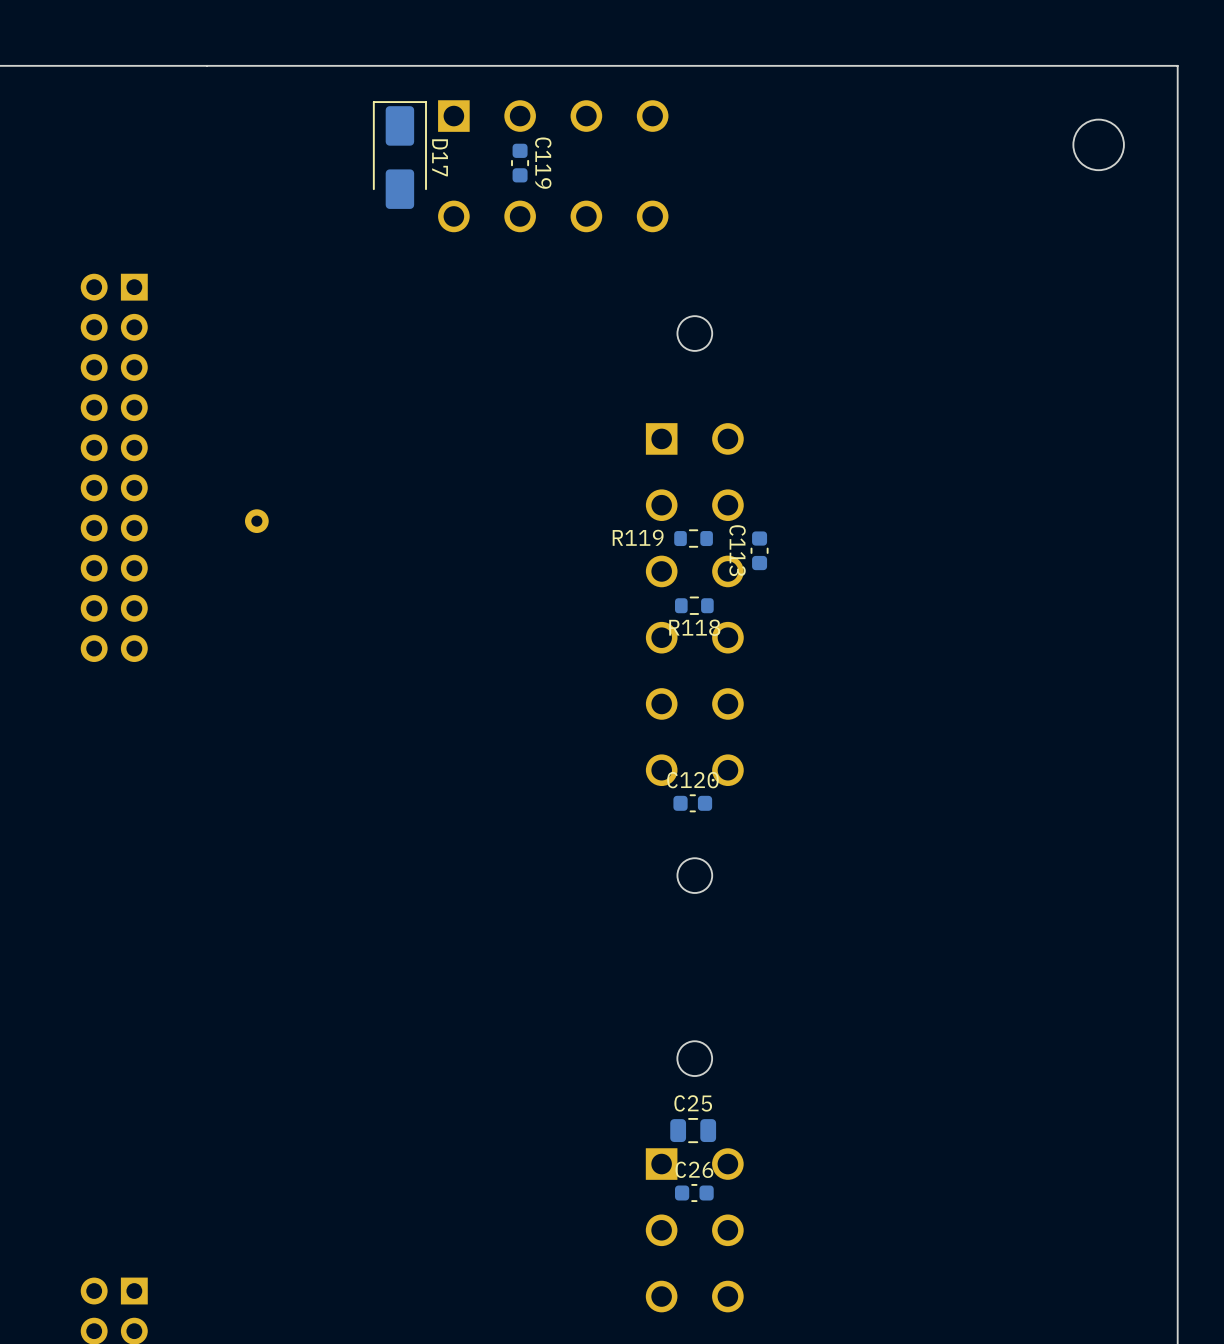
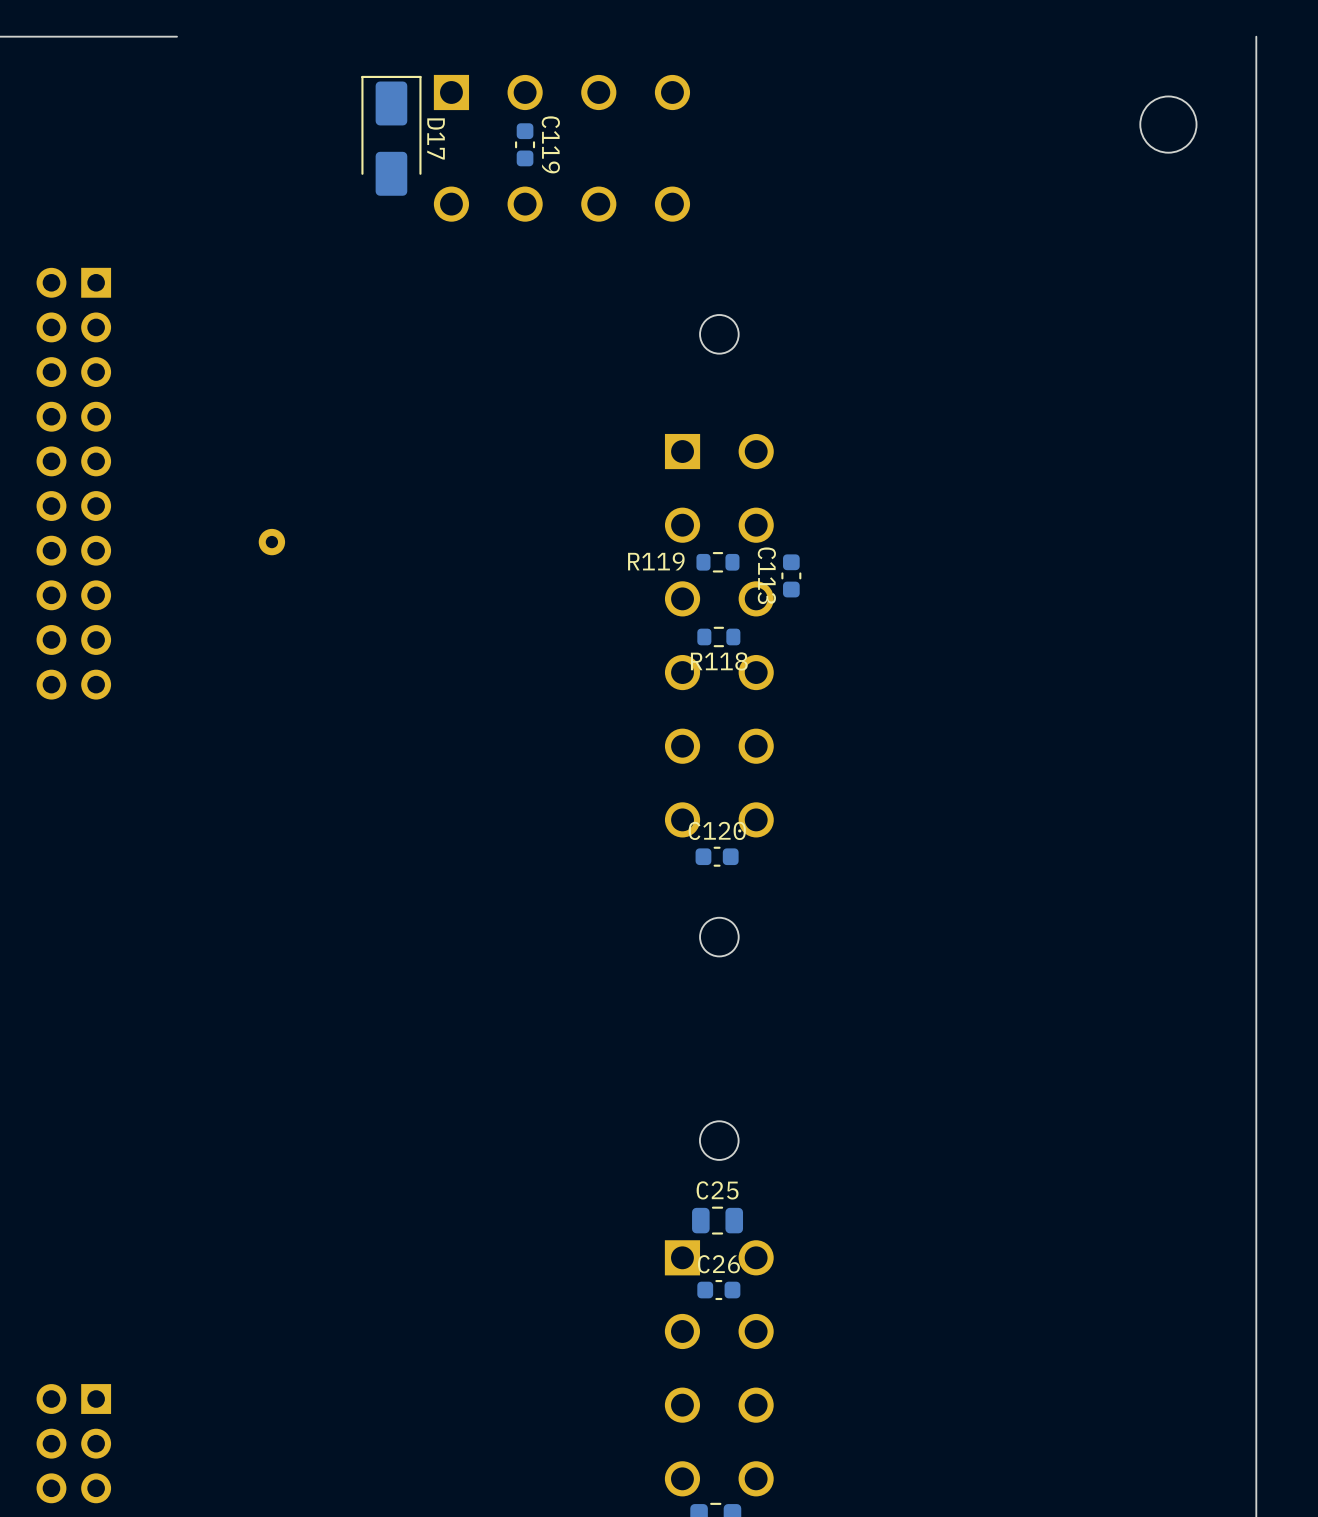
board edge: (1177, 65) (207, 65) -> none
part position: (256, 521) -> (271, 542)

